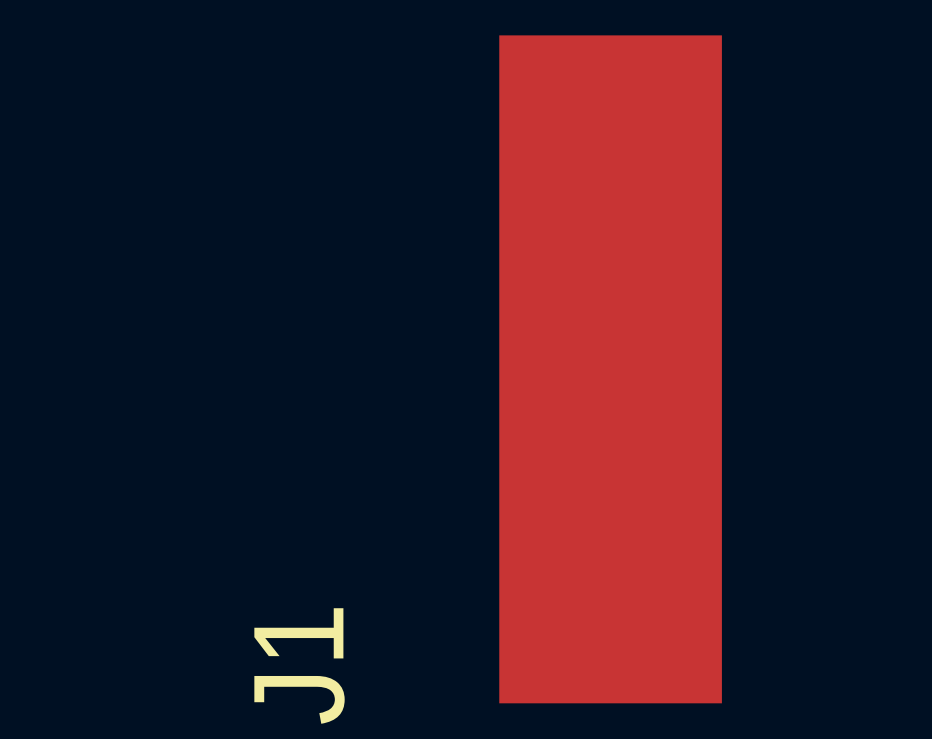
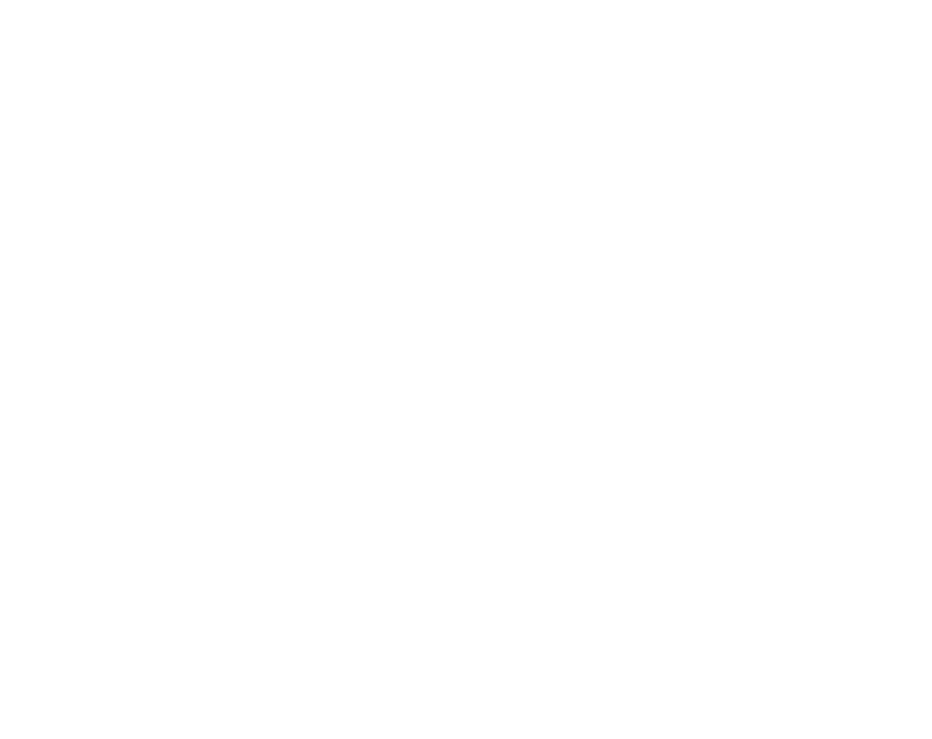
J1: (610, 369) -> none

